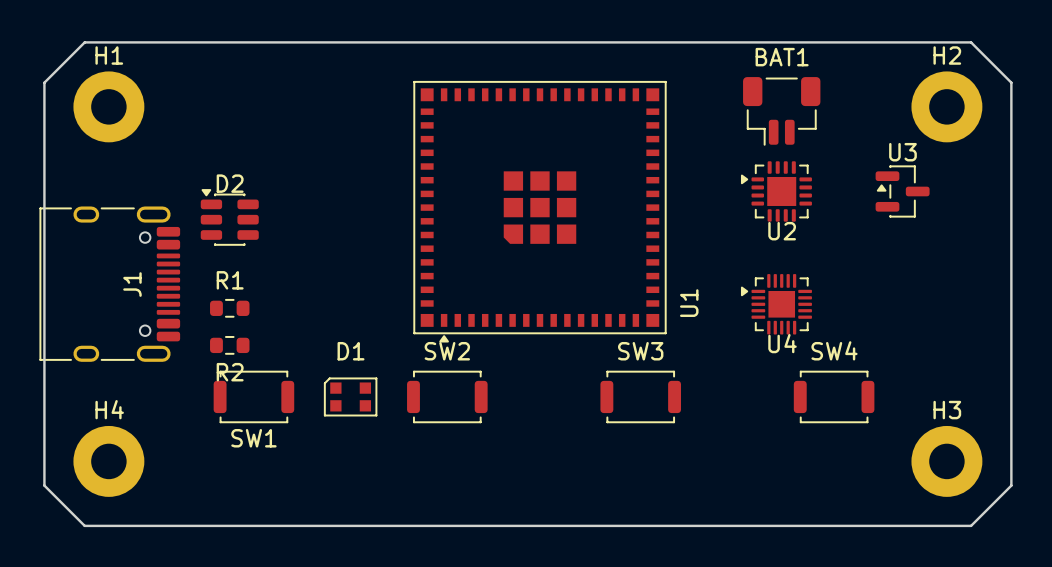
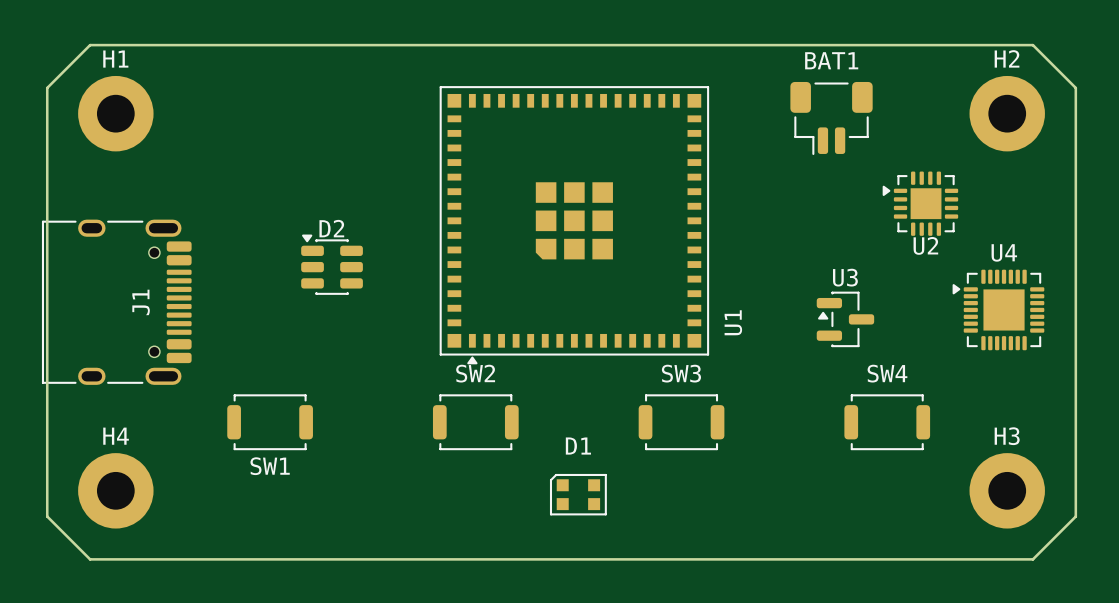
U2 position: (776, 191) -> (920, 203)
U3 position: (902, 191) -> (845, 319)
D2 position: (229, 217) -> (332, 264)
U4 footprint: [740, 274, 812, 335] -> [952, 269, 1045, 351]
R1: (229, 308) -> none
U4 name position: U4 (782, 343) -> U4 (1004, 252)
R2: (229, 345) -> none
D1 position: (350, 396) -> (578, 494)

